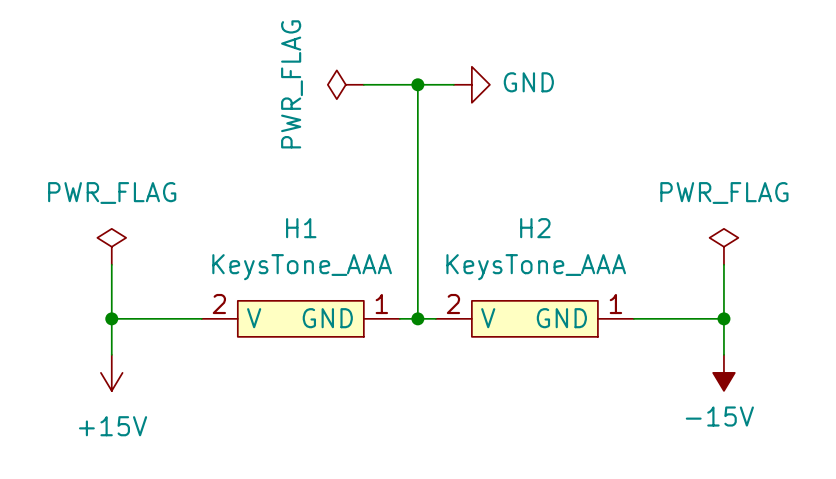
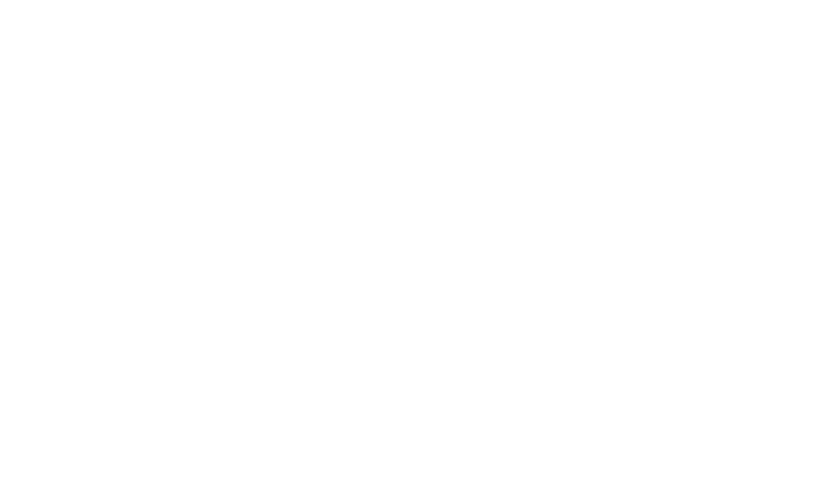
power symbol: PWR_FLAG (345, 84) -> none
wire: (363, 84) (453, 84) -> none
wire: (417, 84) (417, 318) -> none
junction: (417, 84) -> none
power symbol: GND (471, 84) -> none
power symbol: PWR_FLAG (111, 246) -> none
power symbol: PWR_FLAG (723, 246) -> none
wire: (111, 264) (111, 354) -> none
wire: (723, 264) (723, 354) -> none
wire: (111, 318) (201, 318) -> none
junction: (111, 318) -> none
H1: KeysTone_AAA (300, 318) -> none
wire: (399, 318) (435, 318) -> none
junction: (417, 318) -> none
H2: KeysTone_AAA (534, 318) -> none
wire: (633, 318) (723, 318) -> none
junction: (723, 318) -> none
power symbol: +15V (111, 372) -> none
power symbol: -15V (723, 372) -> none

